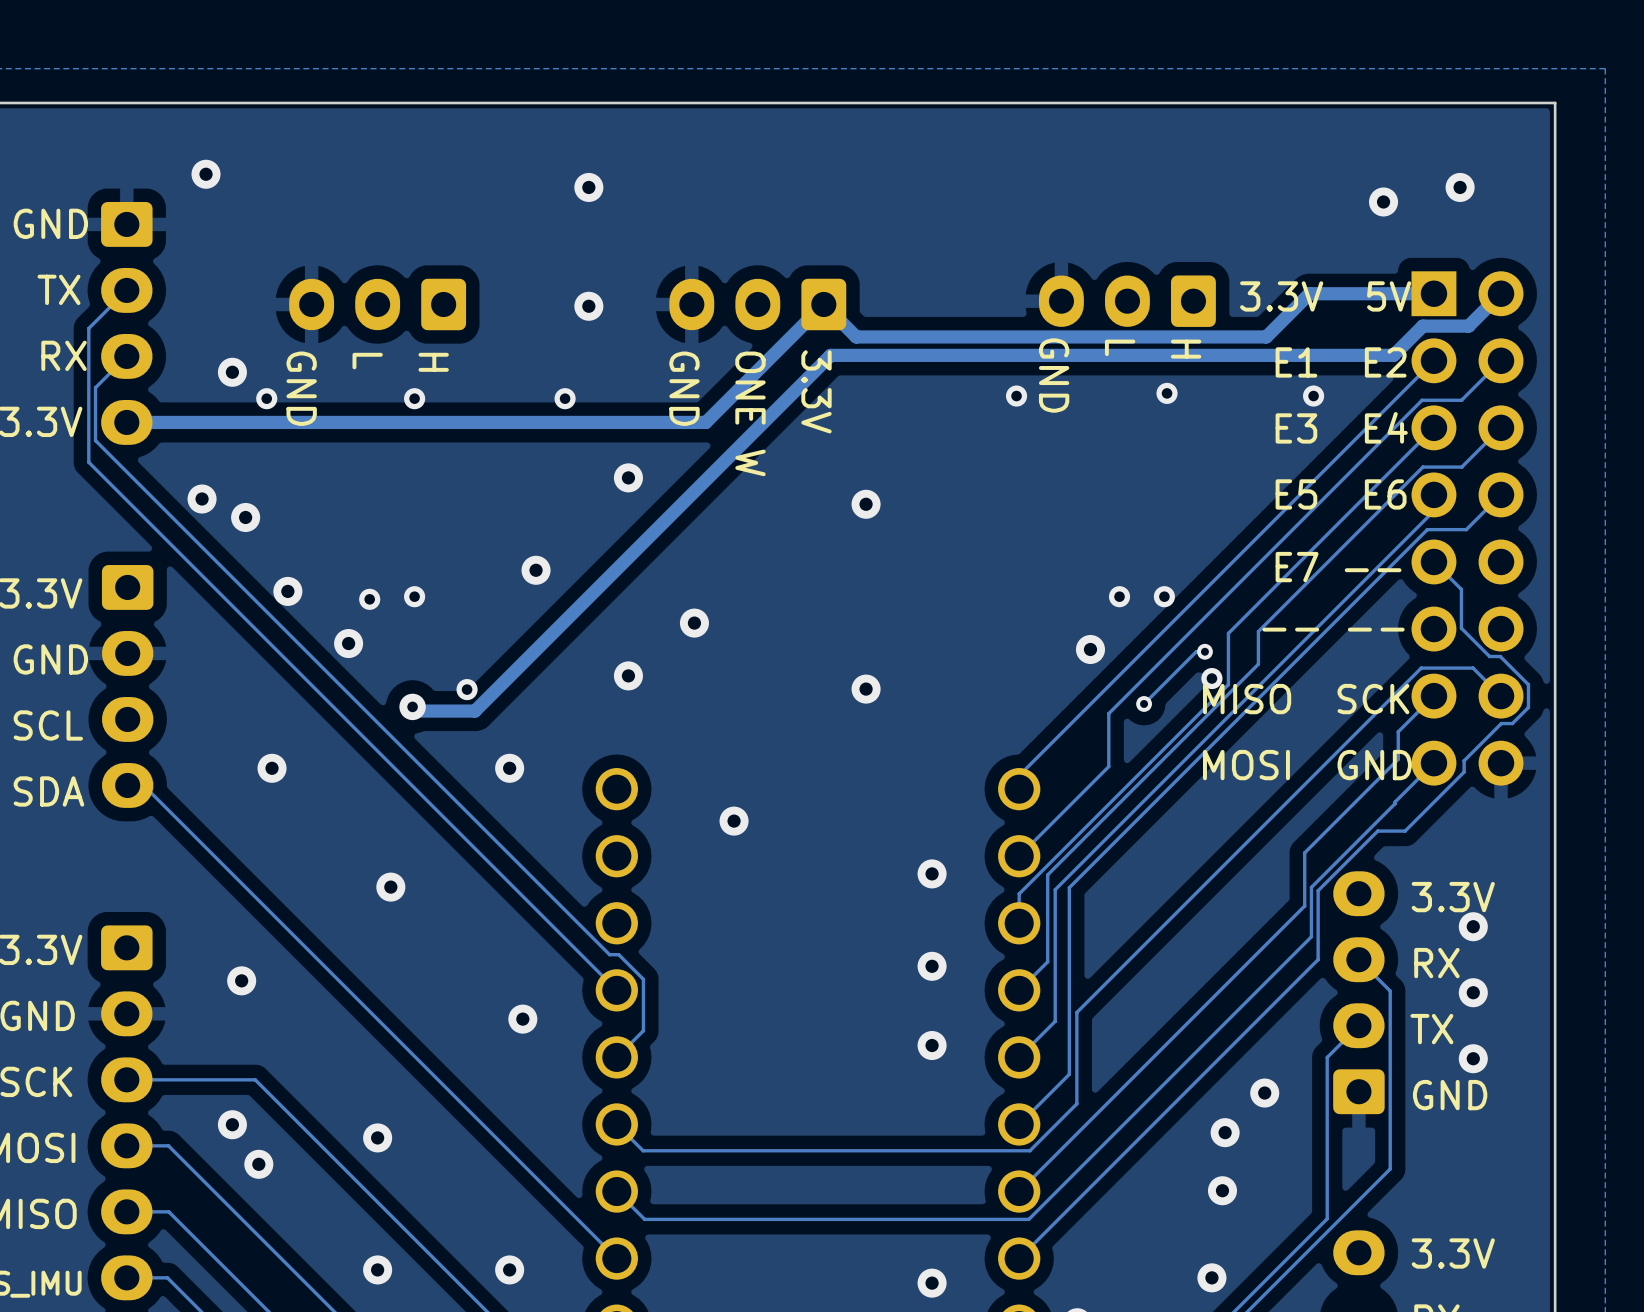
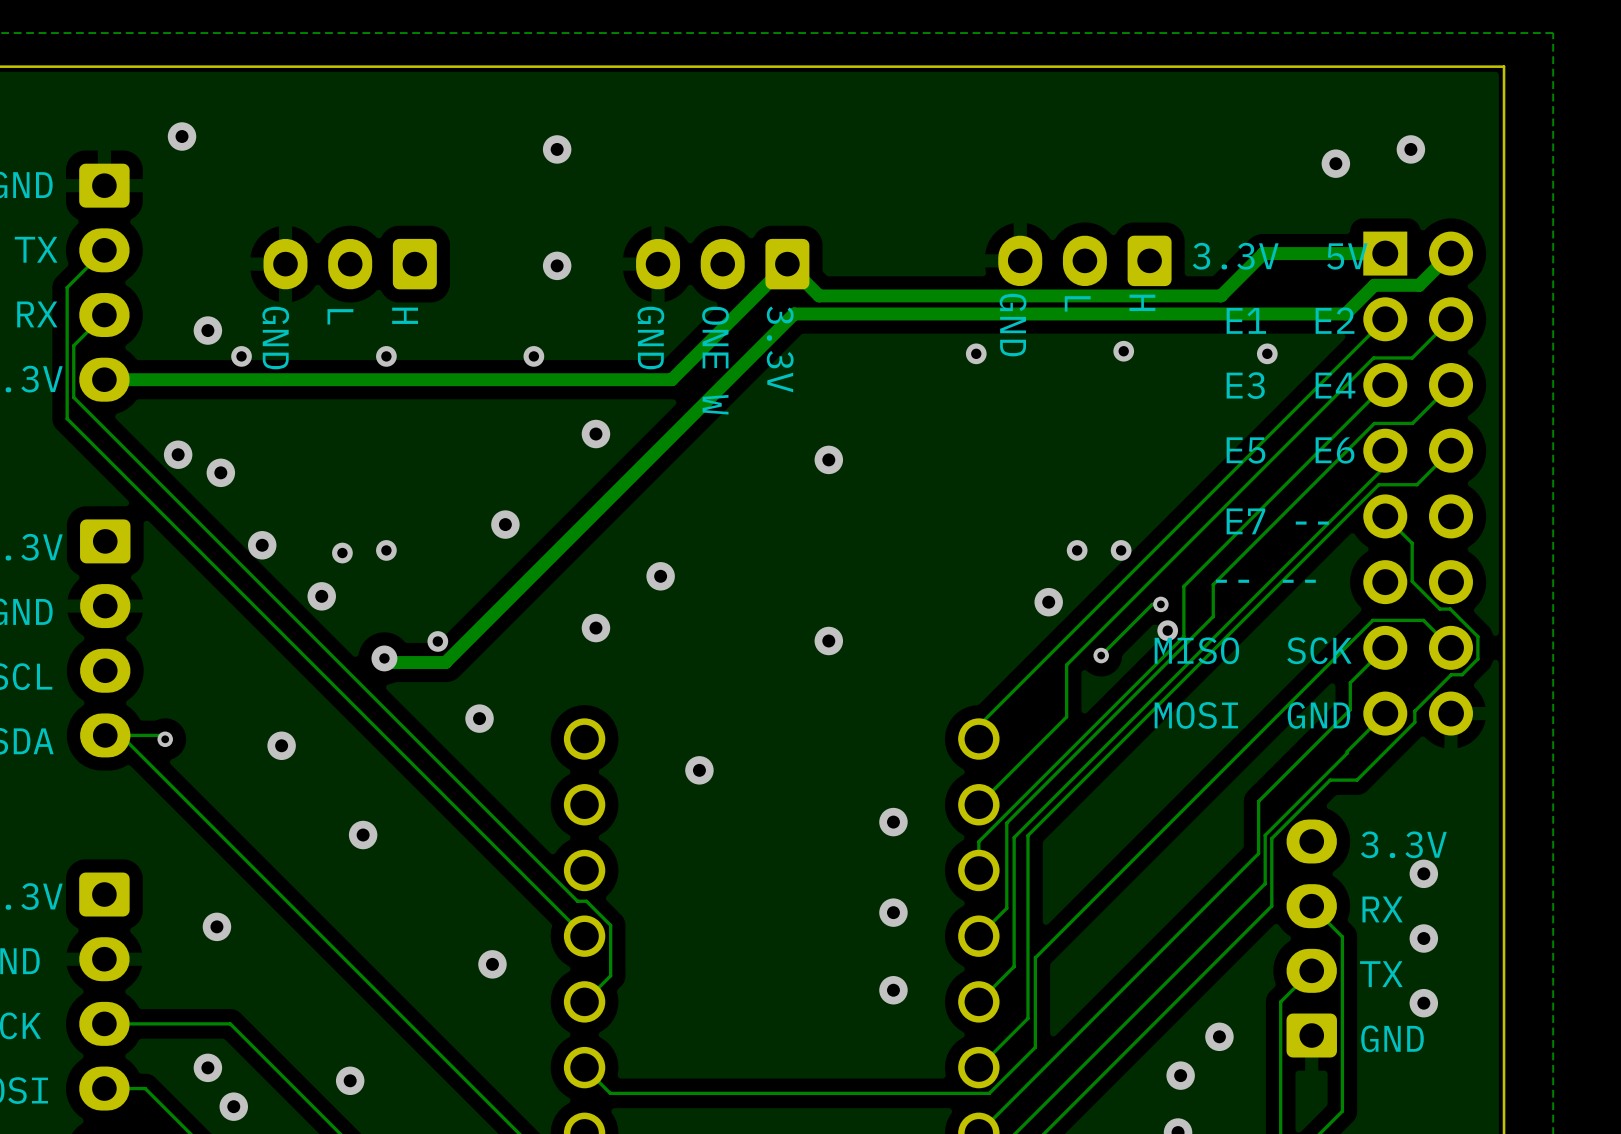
via position: (272, 768) -> (281, 745)
track: none -> (120, 735) (161, 735) (165, 739)
via: none -> (165, 739)

